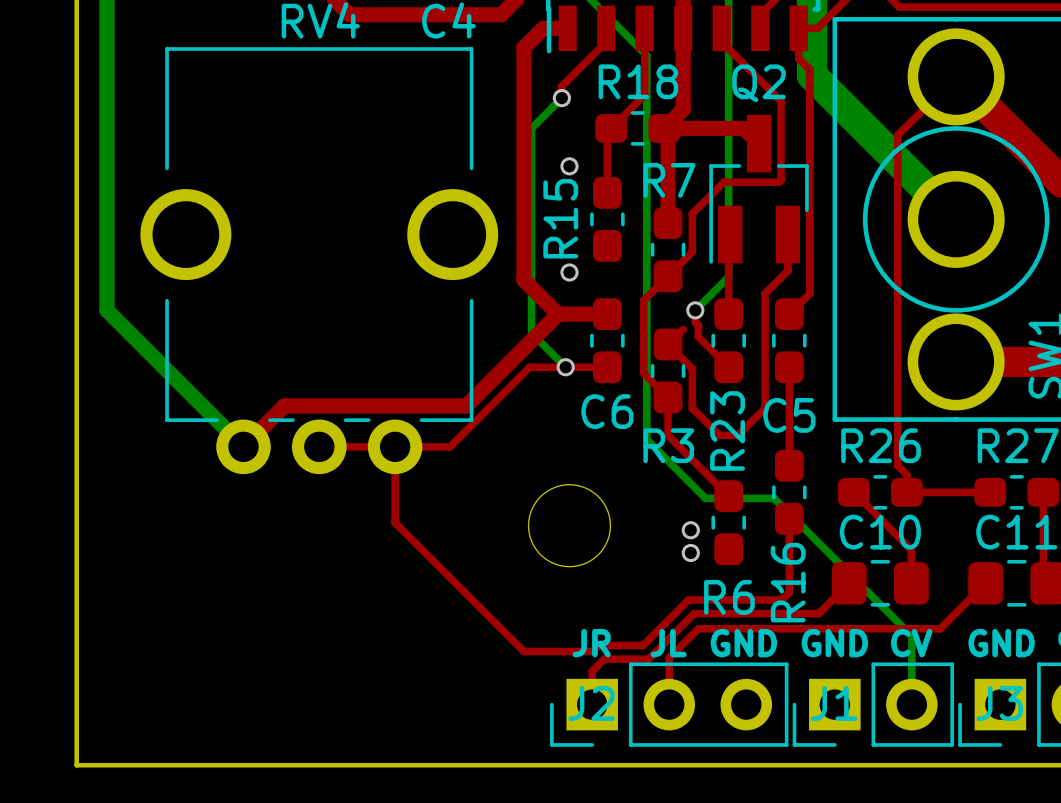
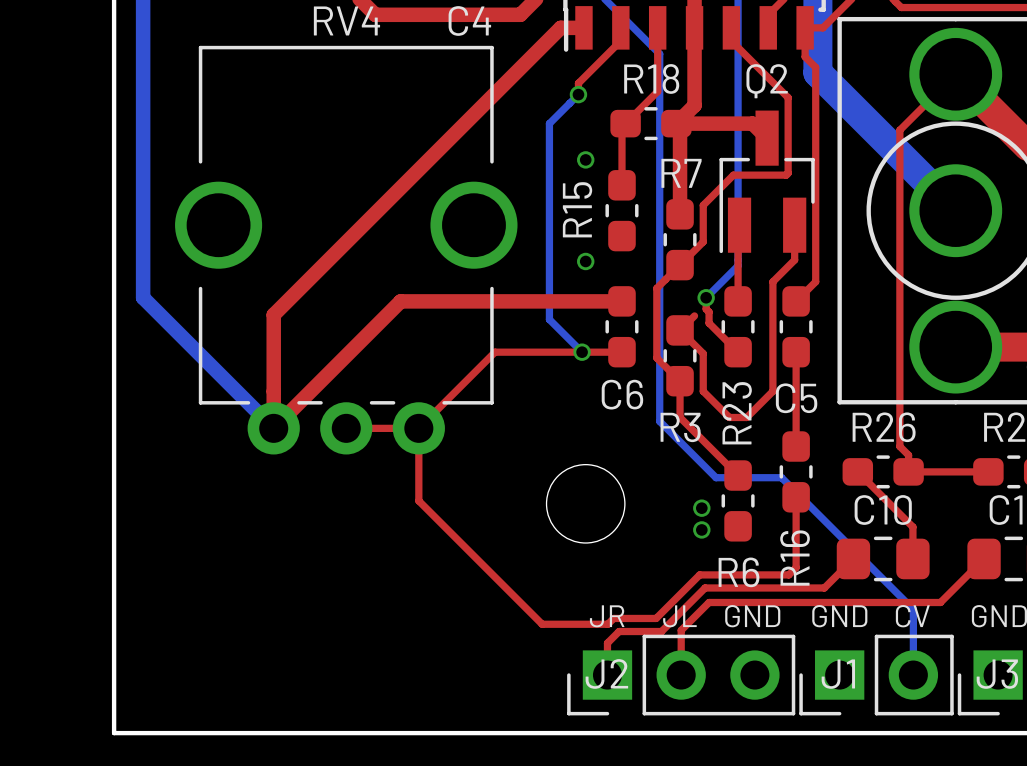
top track: (524, 47) (524, 280) (558, 314) (466, 405) (284, 405) -> (542, 46) (273, 314) (273, 428)
top track: none -> (574, 301) (400, 301) (312, 389)
top track: (529, 367) (450, 446) (395, 446) -> (547, 352) (495, 352) (418, 428)

